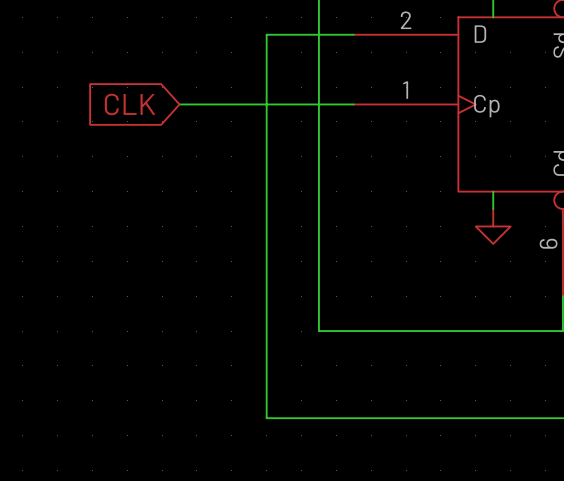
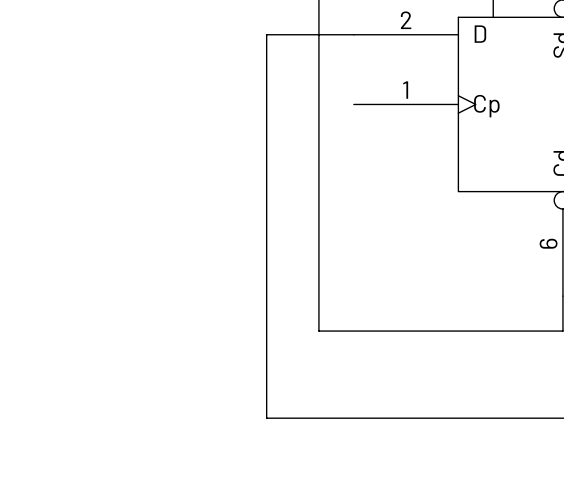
global label: CLK (129, 104) -> none
wire: (179, 104) (353, 104) -> none
wire: (493, 191) (493, 209) -> none
power symbol: (493, 226) -> none

